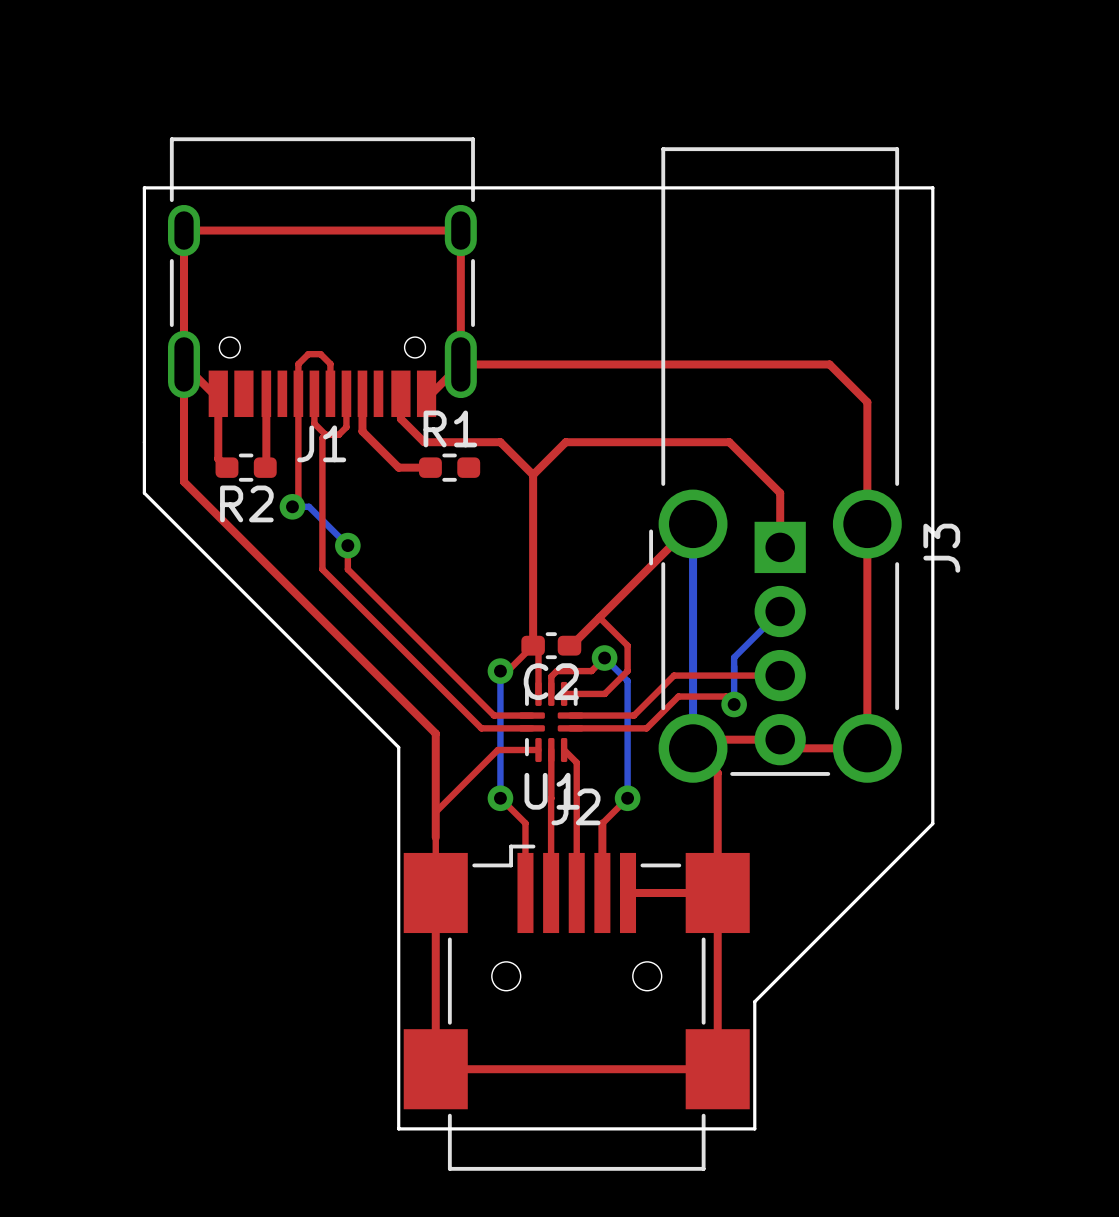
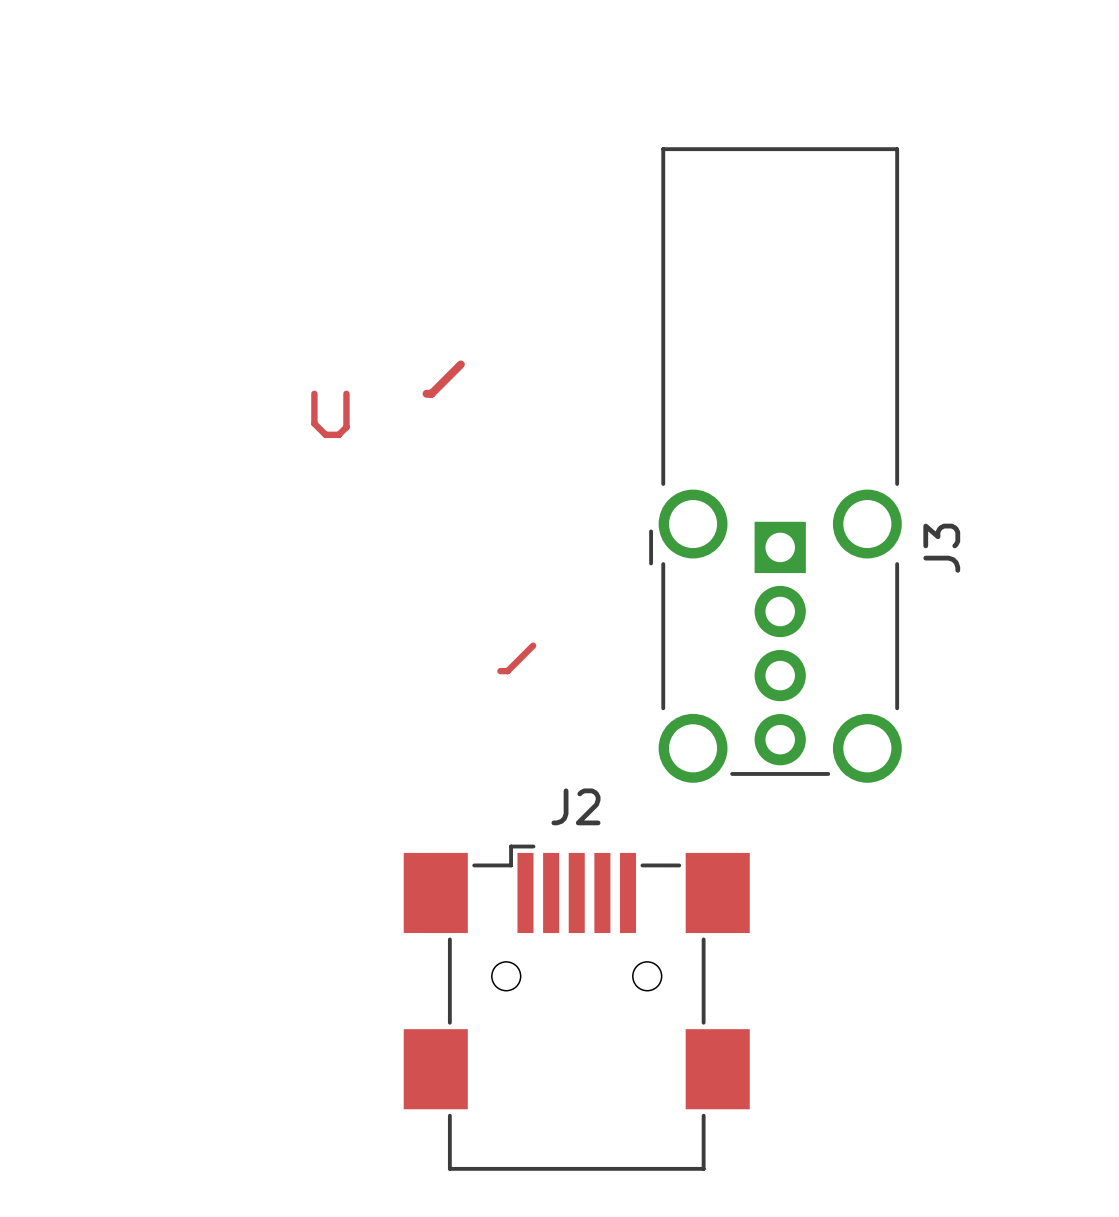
board edge: (144, 187) (144, 493) (398, 747) (398, 1128) (754, 1128) (754, 1001) (932, 823) (932, 187) (144, 187) -> none
J1: (322, 277) -> none
top track: (184, 364) (213, 393) (218, 393) (218, 458) (226, 467) -> none
top track: (266, 393) (265, 467) -> none
top track: (330, 393) (330, 363) (320, 354) (308, 354) (298, 364) (298, 500) (292, 506) -> none
top track: (362, 393) (362, 431) (398, 467) (430, 467) -> none
top track: (400, 393) (400, 418) (424, 442) (500, 442) (533, 474) -> none
top track: (325, 434) (322, 438) (322, 569) (481, 728) (532, 728) -> none
R2: (246, 467) -> none
R1: (449, 467) -> none
top track: (533, 474) (565, 442) (729, 442) (780, 493) (780, 547) -> none
top track: (533, 474) (533, 645) (538, 651) (538, 693) -> none
bottom track: (292, 506) (309, 506) (347, 545) -> none
via: (292, 506) -> none
top track: (693, 524) (569, 645) -> none
bottom track: (693, 524) (693, 748) -> none
top track: (347, 545) (347, 569) (494, 715) (532, 715) -> none
via: (347, 545) -> none
bottom track: (780, 611) (734, 657) (734, 704) -> none
top track: (599, 617) (627, 645) (627, 671) (604, 693) (564, 693) -> none
C2: (551, 645) -> none
top track: (604, 658) (591, 671) (556, 671) (551, 676) (551, 693) -> none
bottom track: (604, 658) (627, 681) (627, 798) -> none
via: (604, 658) -> none
bottom track: (500, 671) (500, 798) -> none
via: (500, 671) -> none
top track: (780, 675) (673, 675) (634, 715) (570, 715) -> none
top track: (734, 704) (726, 696) (678, 696) (646, 728) (570, 728) -> none
via: (734, 704) -> none
U1: (551, 721) -> none
top track: (538, 750) (497, 750) (435, 812) (435, 892) (435, 1069) (717, 1069) (717, 772) (693, 748) (701, 739) (780, 739) (788, 748) (867, 748) (867, 402) (829, 364) (460, 364) (460, 230) (184, 230) (184, 481) (435, 733) (435, 837) -> none
top track: (551, 750) (551, 798) -> none
top track: (564, 750) (576, 762) (576, 892) -> none
top track: (500, 798) (525, 823) (525, 892) -> none
via: (500, 798) -> none
top track: (551, 798) (551, 892) -> none
top track: (627, 798) (602, 823) (602, 892) -> none
via: (627, 798) -> none
top track: (628, 892) (717, 892) -> none

